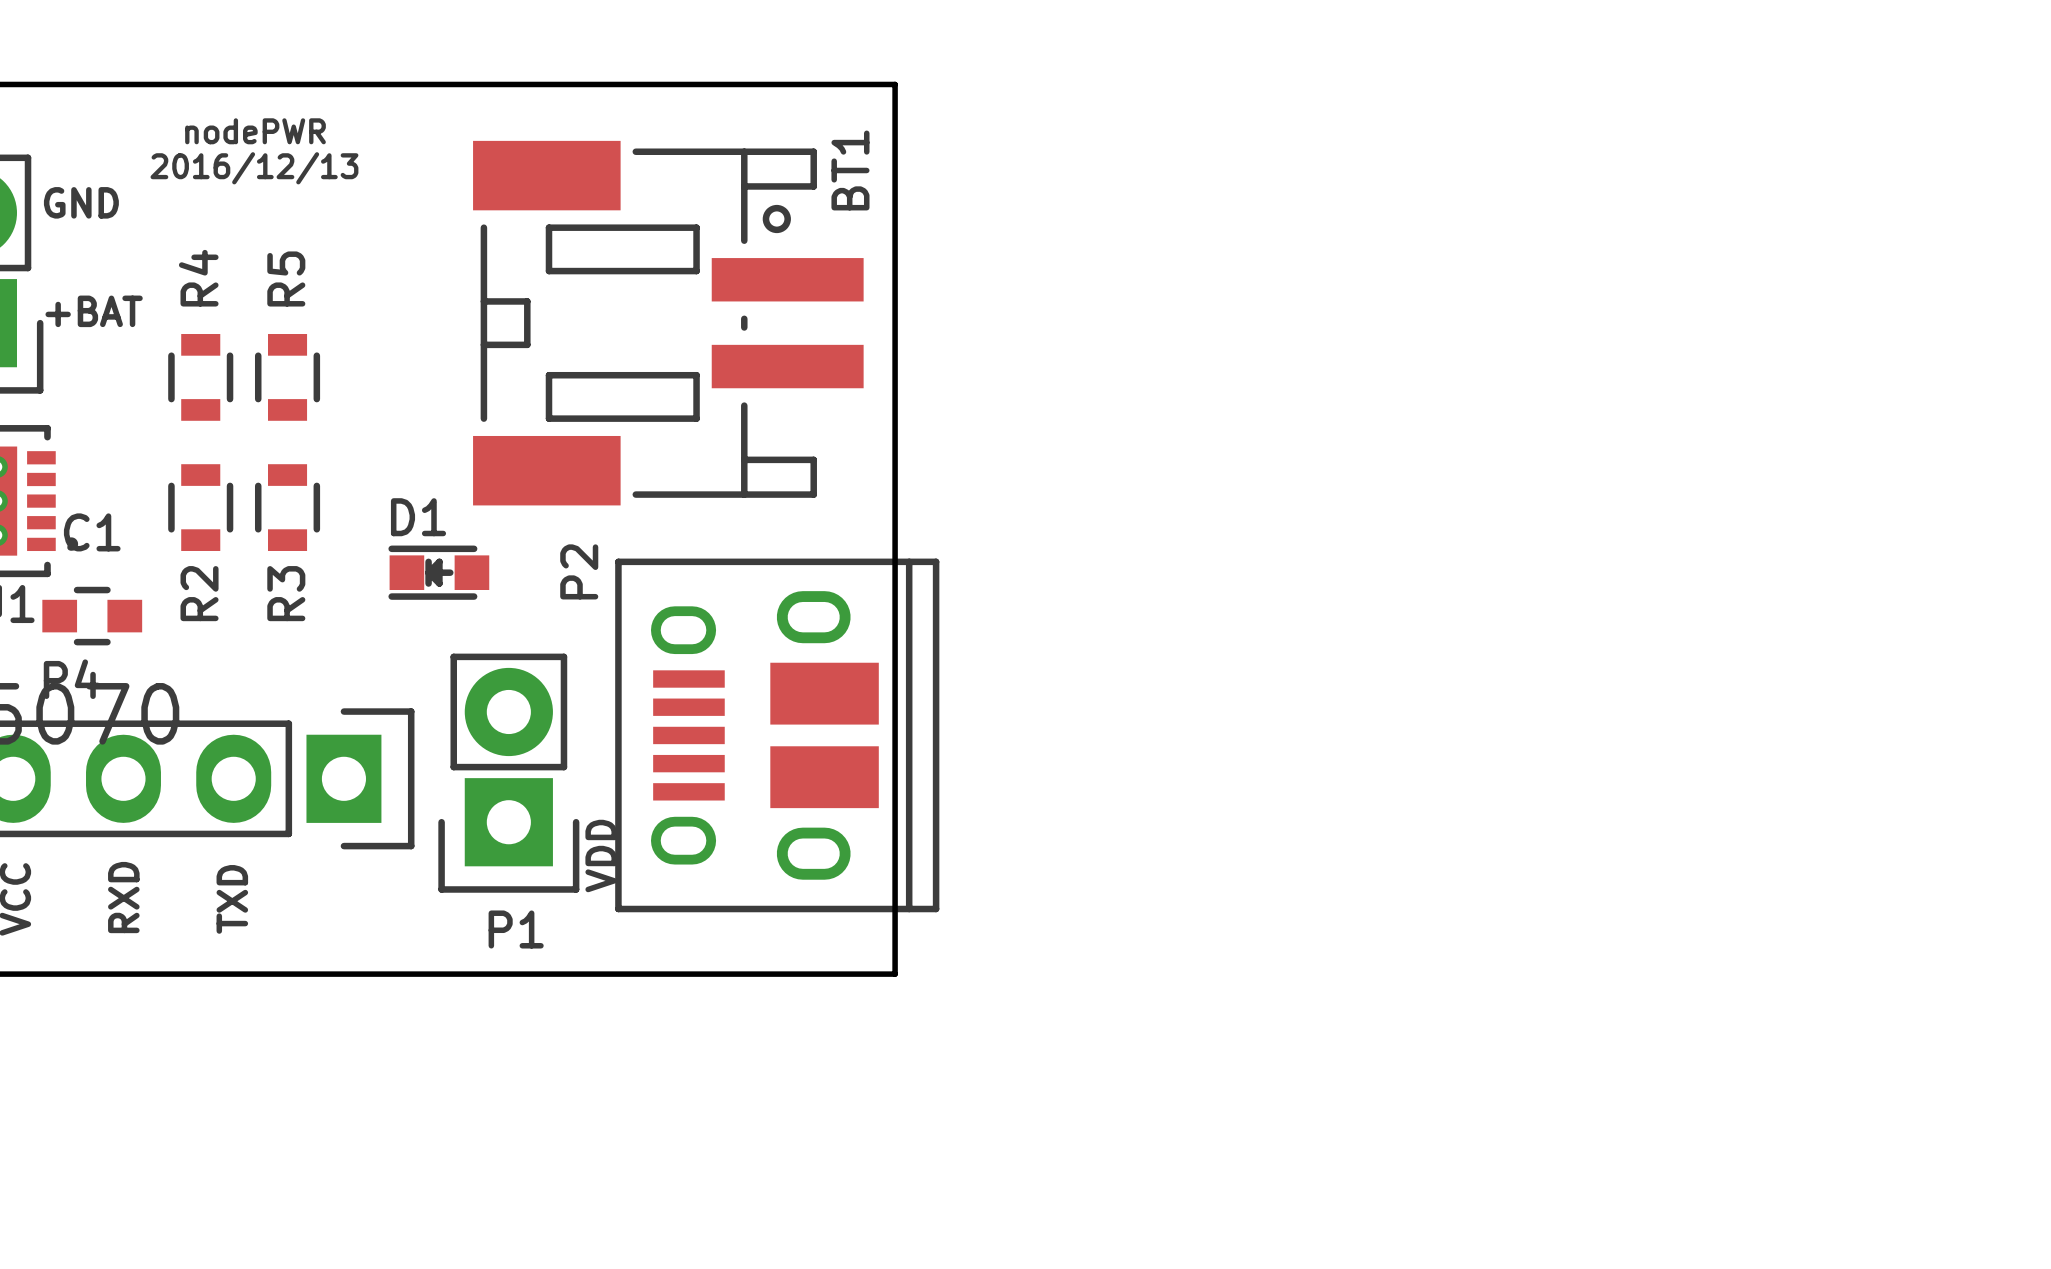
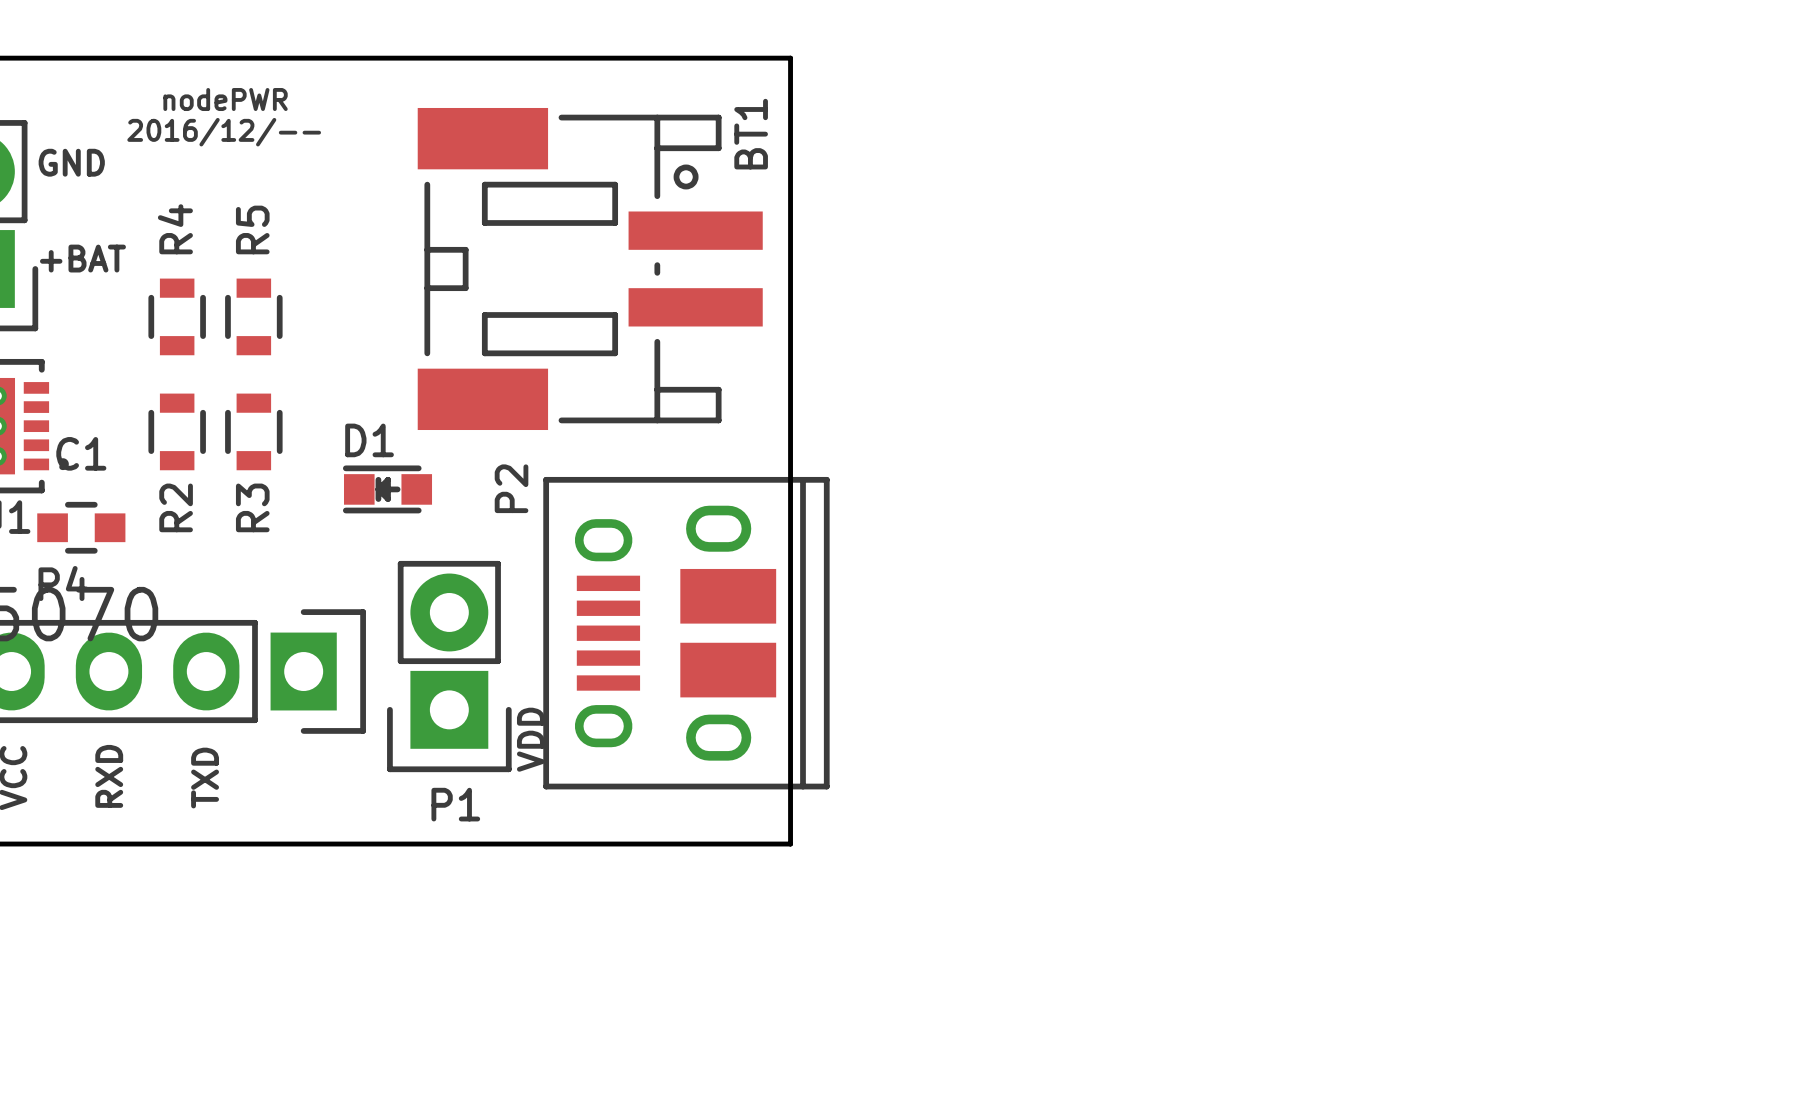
text: 2016/12/13 (254, 168) -> 2016/12/-- (224, 132)

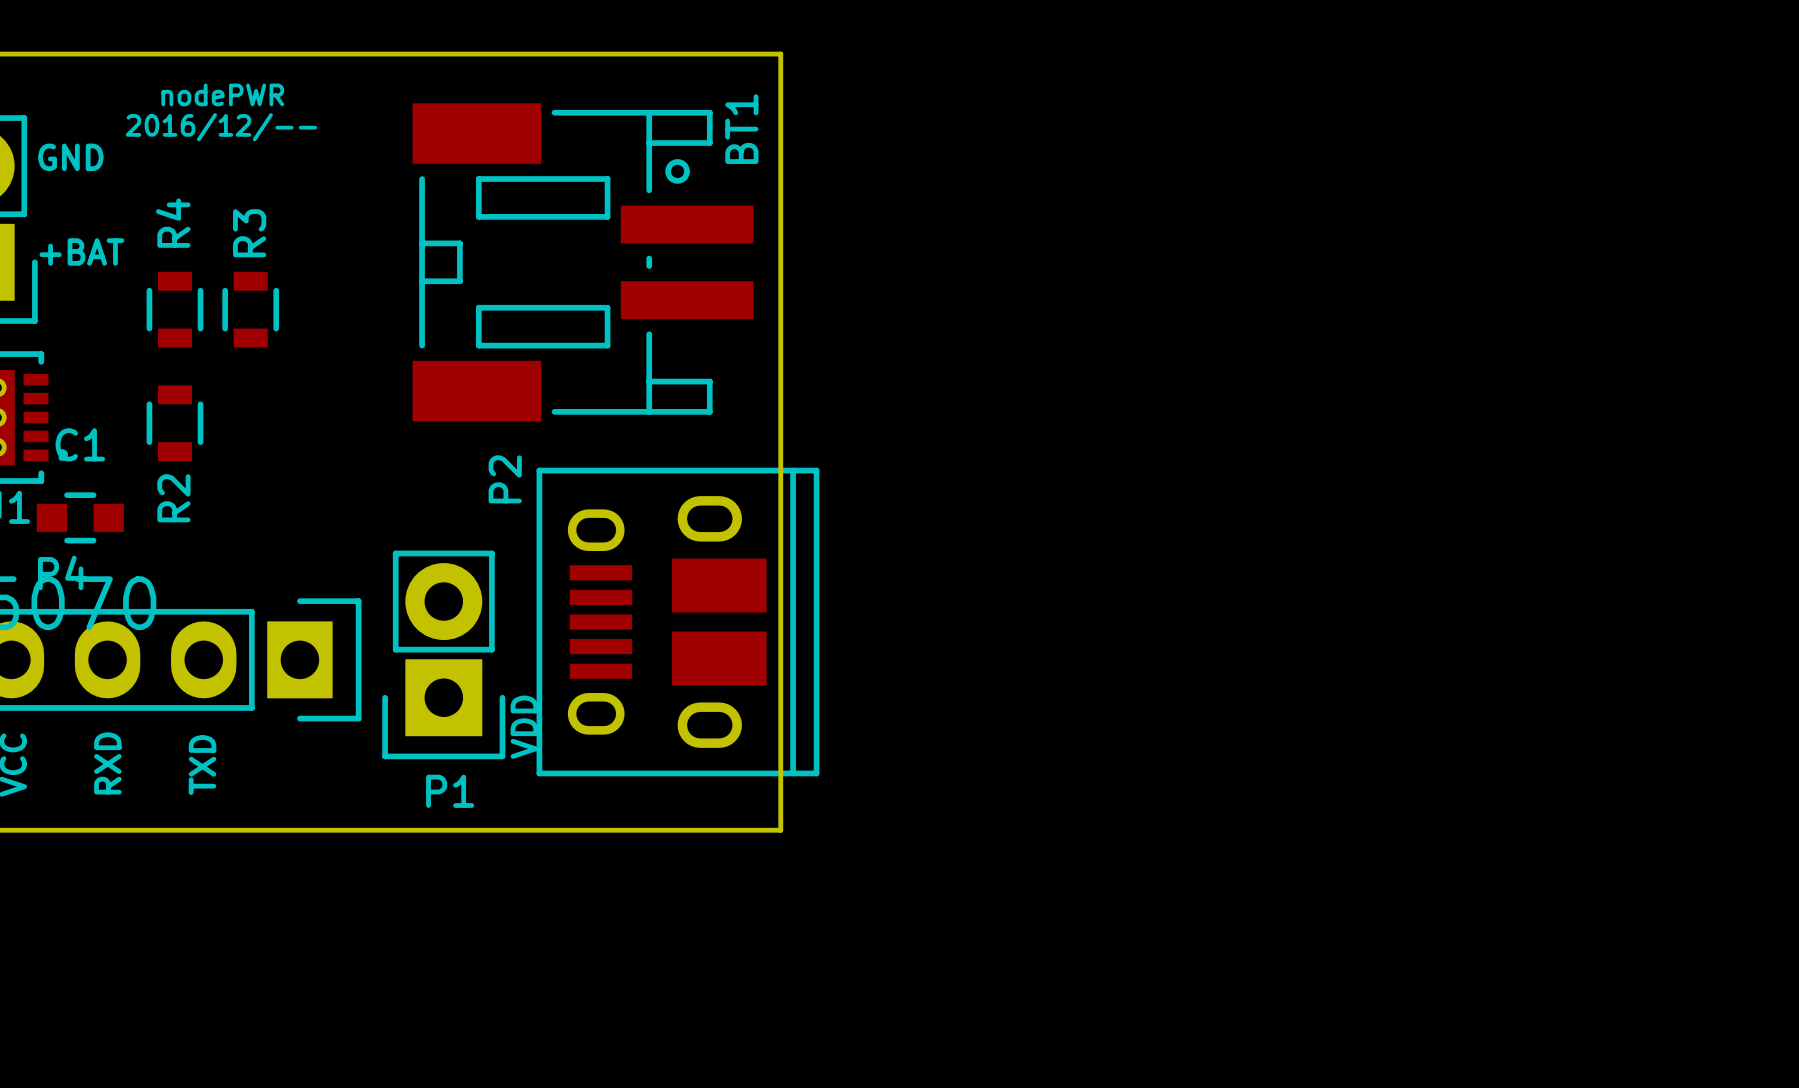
R5 name: R5 (252, 229) -> R3 (249, 233)
R3: (253, 431) -> none
D1: (387, 489) -> none

